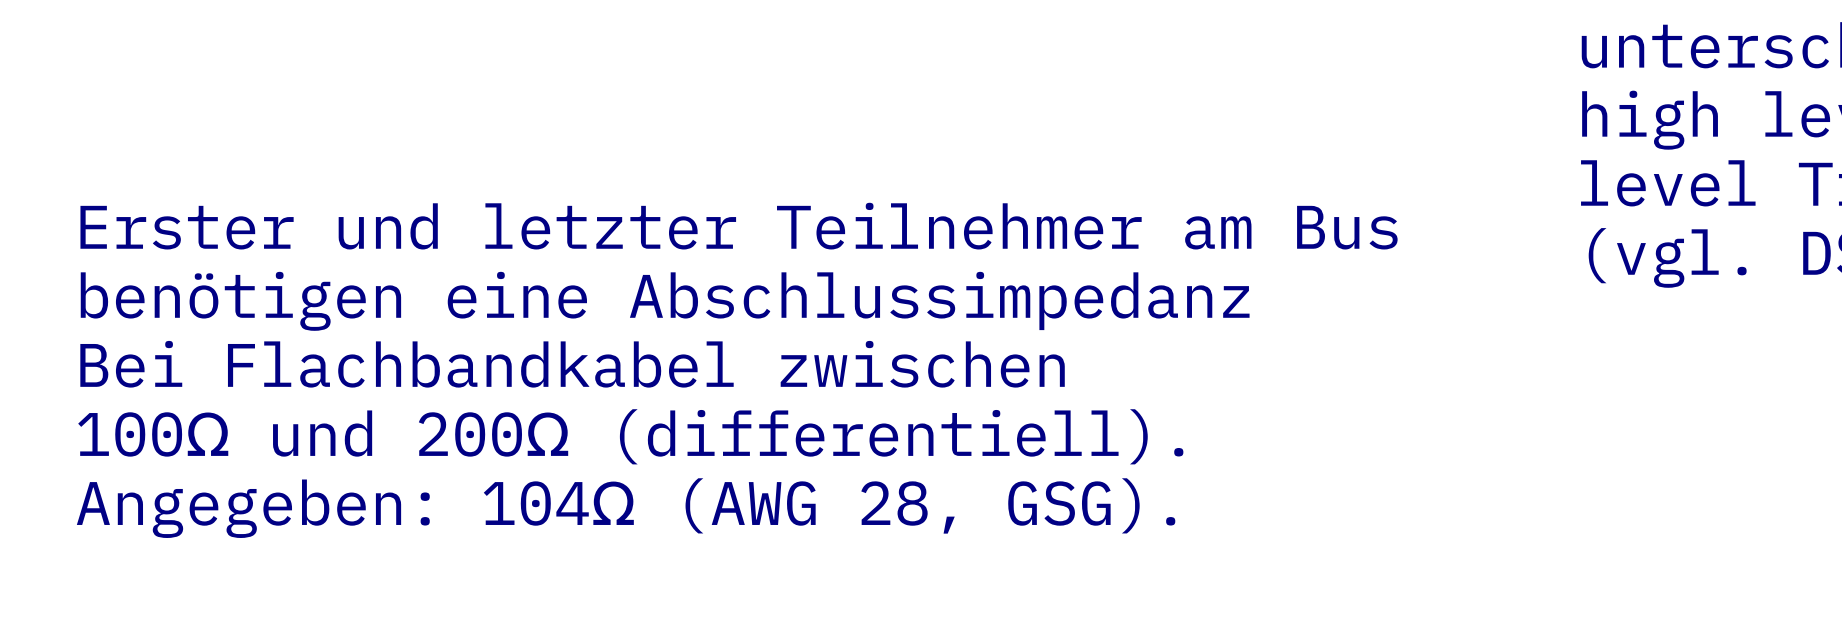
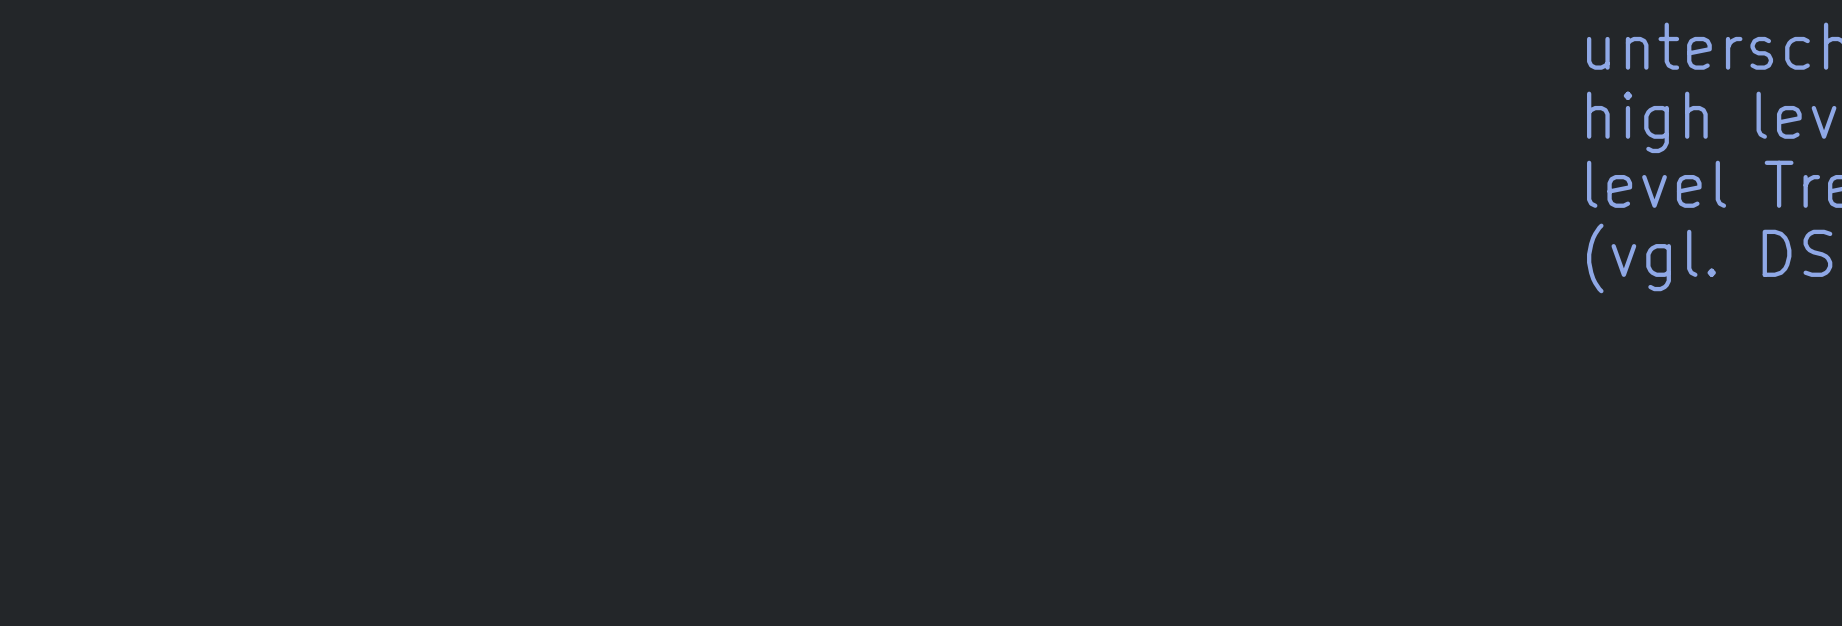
text: Erster und letzter Teilnehmer am Bus (739, 226) -> none
text: benötigen eine Abschlussimpedanz (665, 301) -> none
text: Bei Flachbandkabel zwischen (572, 364) -> none
text: 100Ω und 200Ω (differentiell). (630, 436) -> none
text: Angegeben: 104Ω (AWG 28, GSG). (626, 508) -> none

